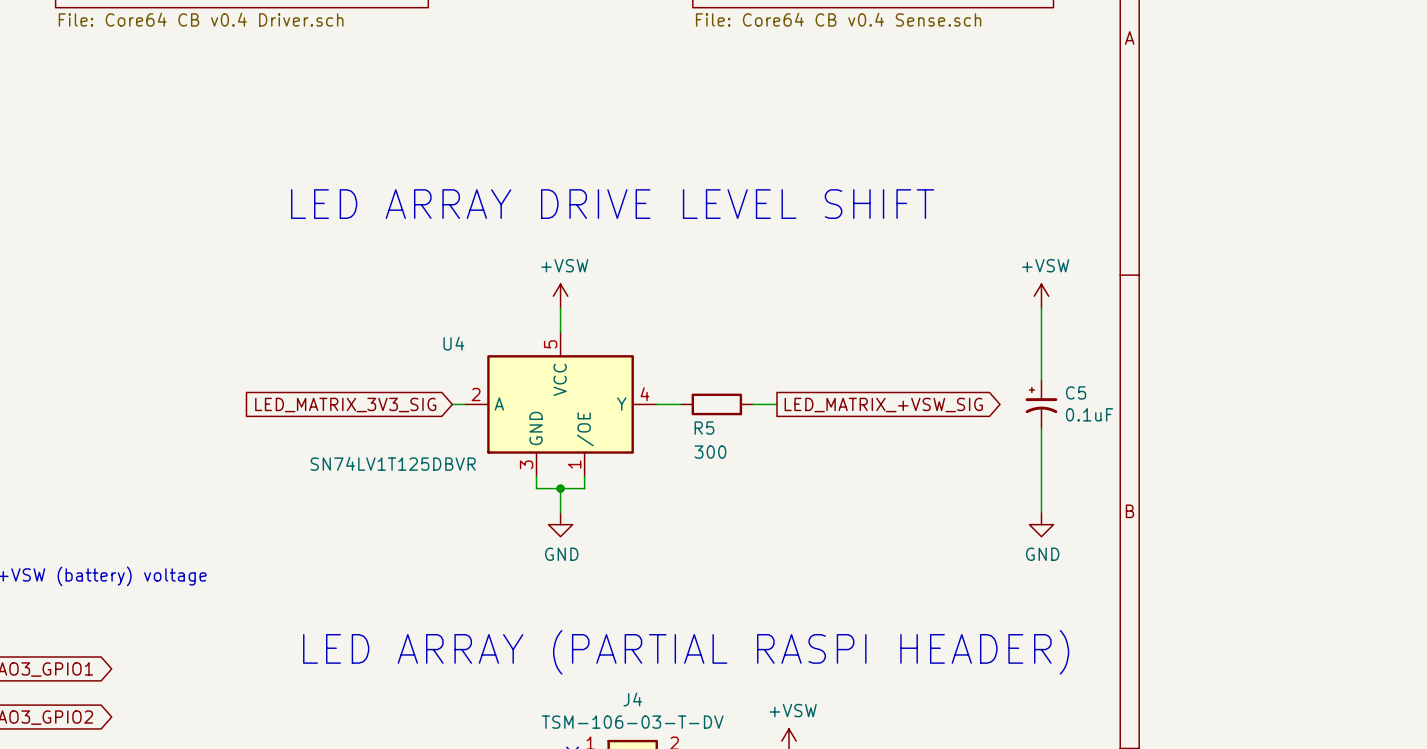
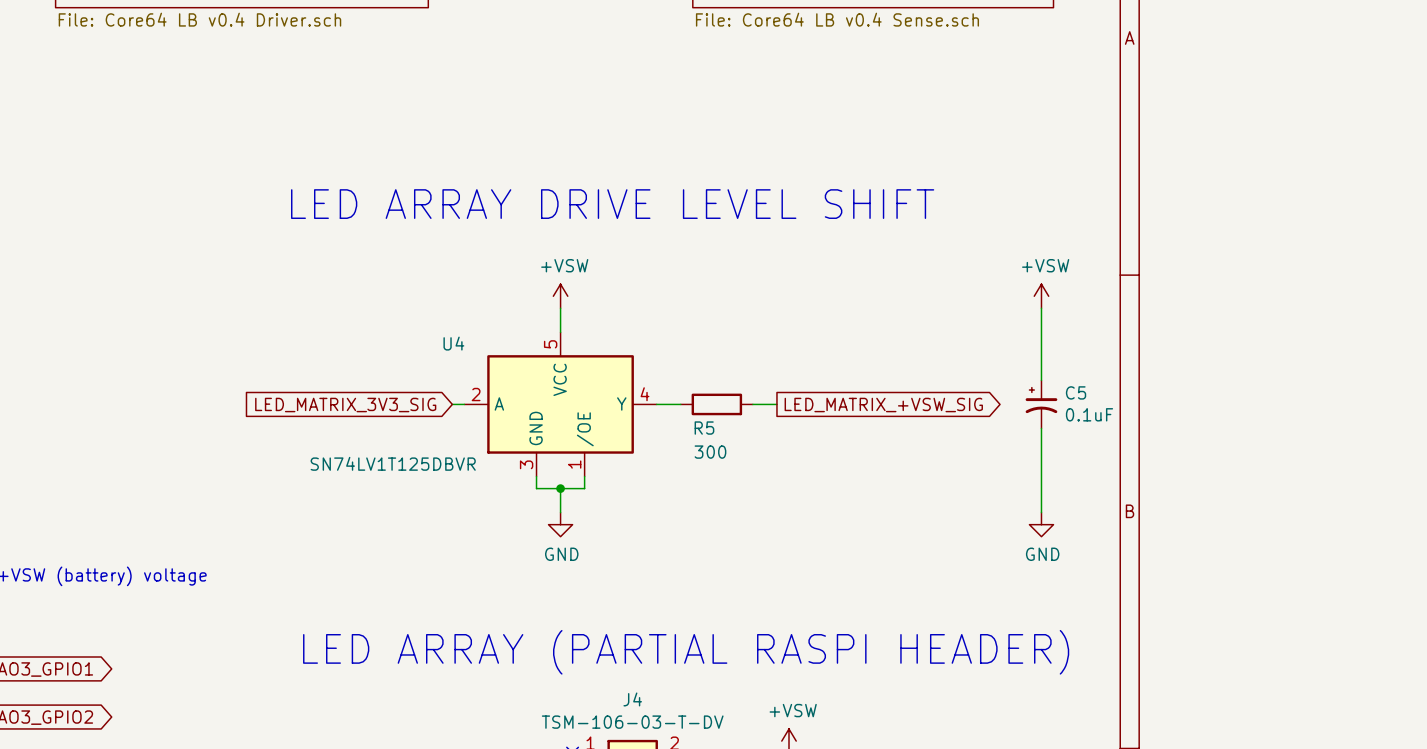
sheet value: File: Core64 CB v0.4 Driver.sch (201, 19) -> File: Core64 LB v0.4 Driver.sch (199, 19)
sheet value: File: Core64 CB v0.4 Sense.sch (838, 19) -> File: Core64 LB v0.4 Sense.sch (837, 19)

